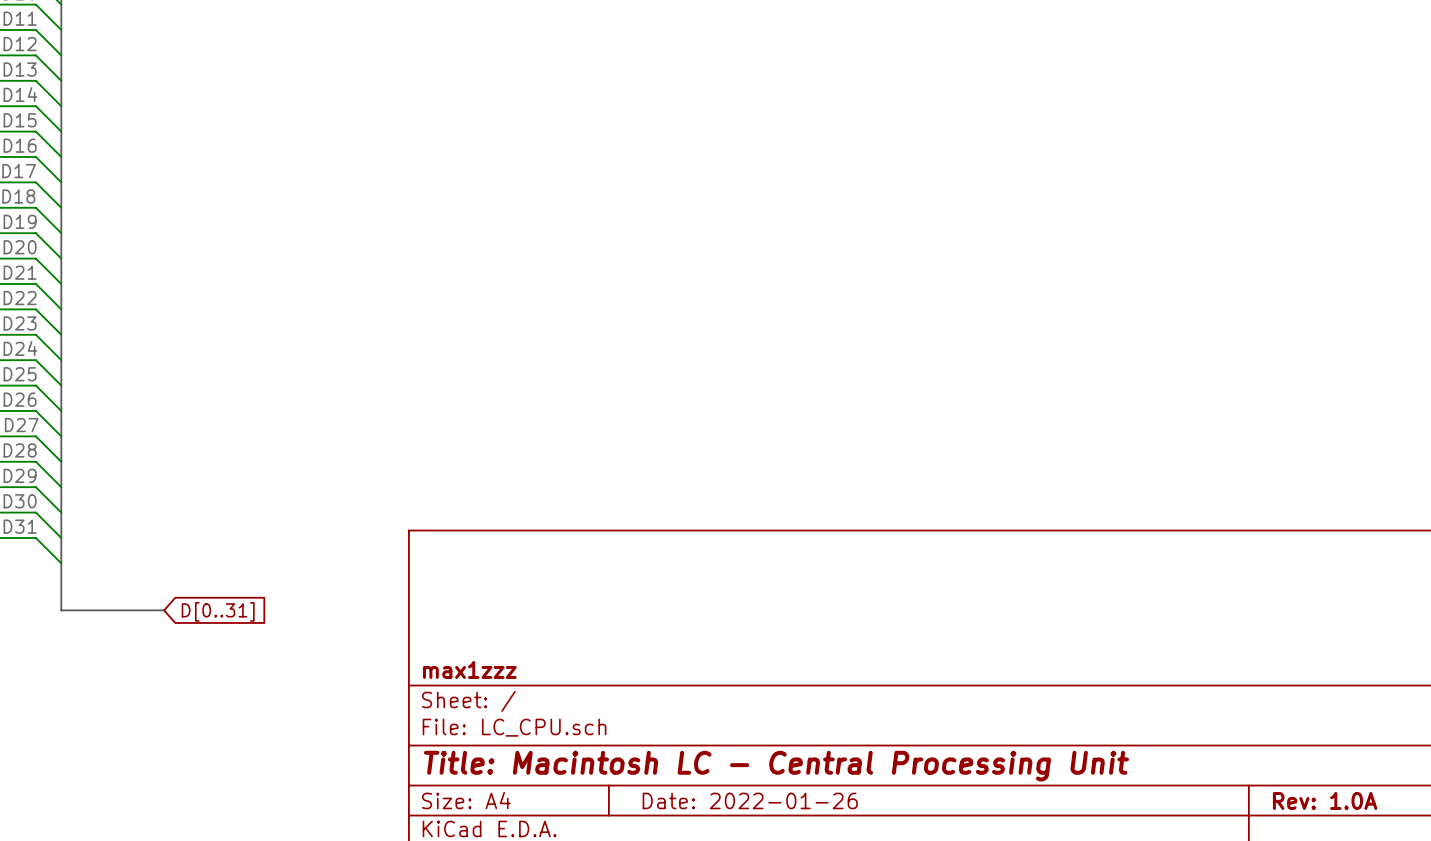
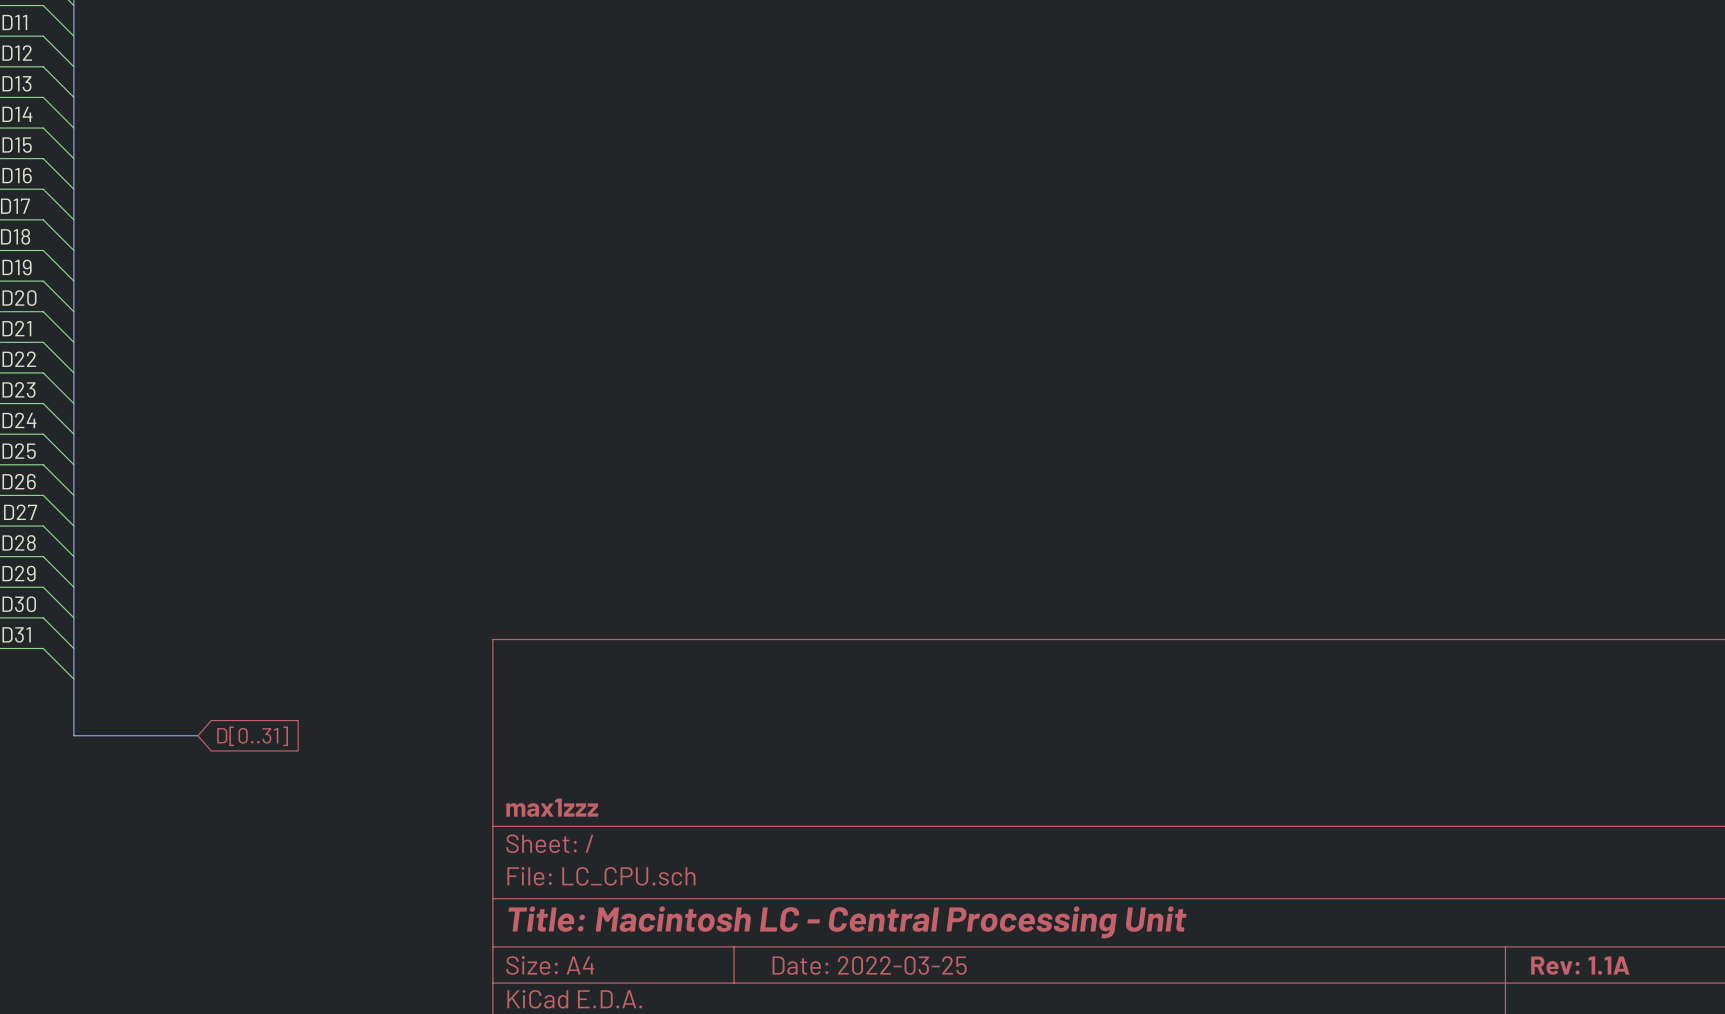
title block: Date: 2022-01-26 (750, 800) -> Date: 2022-03-25 (869, 965)
title block: Rev: 1.0A (1325, 800) -> Rev: 1.1A (1580, 965)

